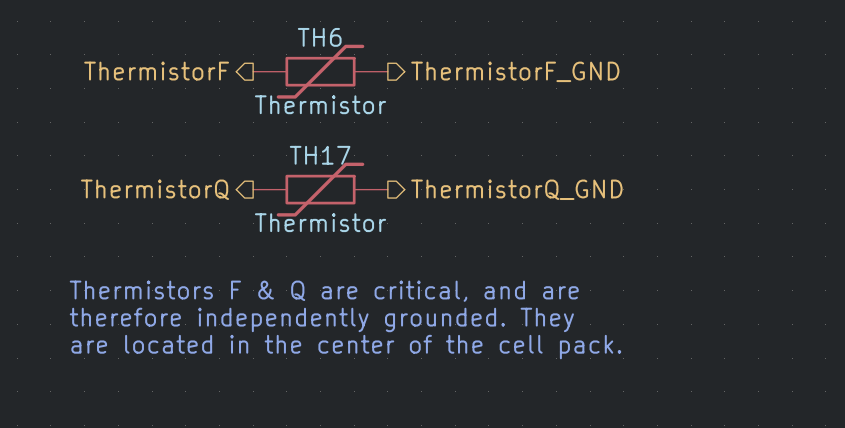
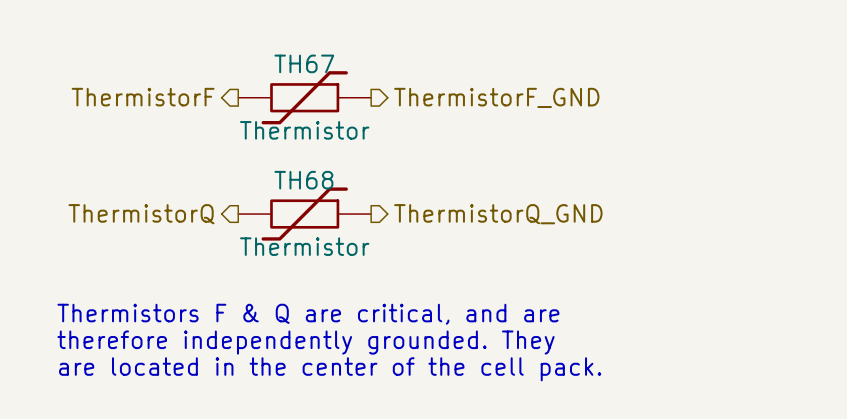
TH6 name: TH6 (319, 37) -> TH67 (304, 63)
TH17 name: TH17 (320, 155) -> TH68 (303, 180)

